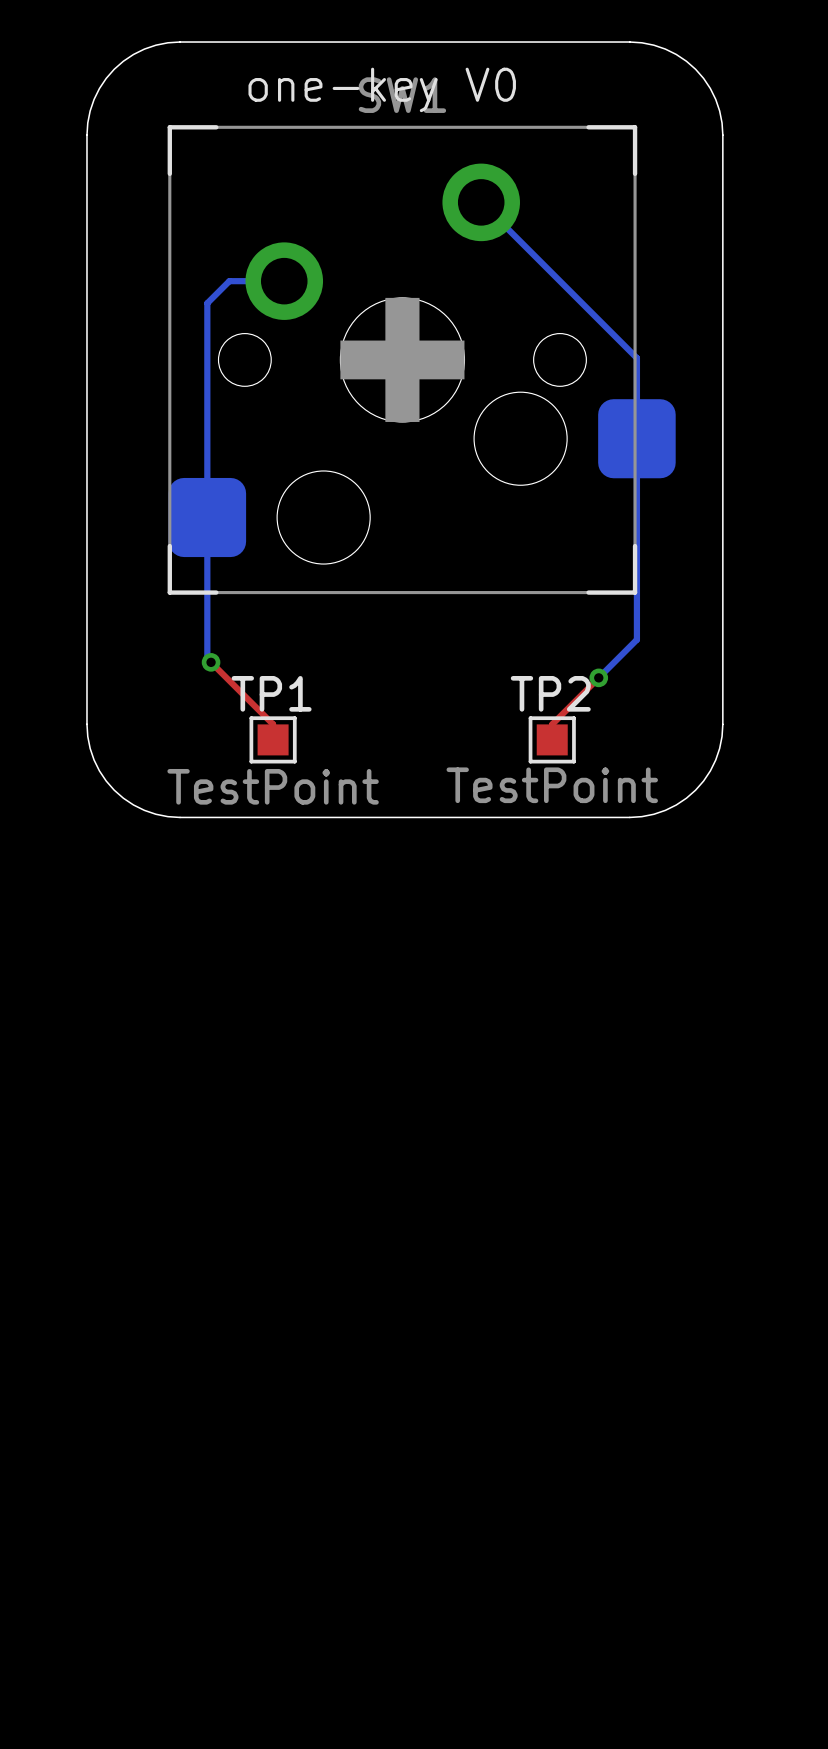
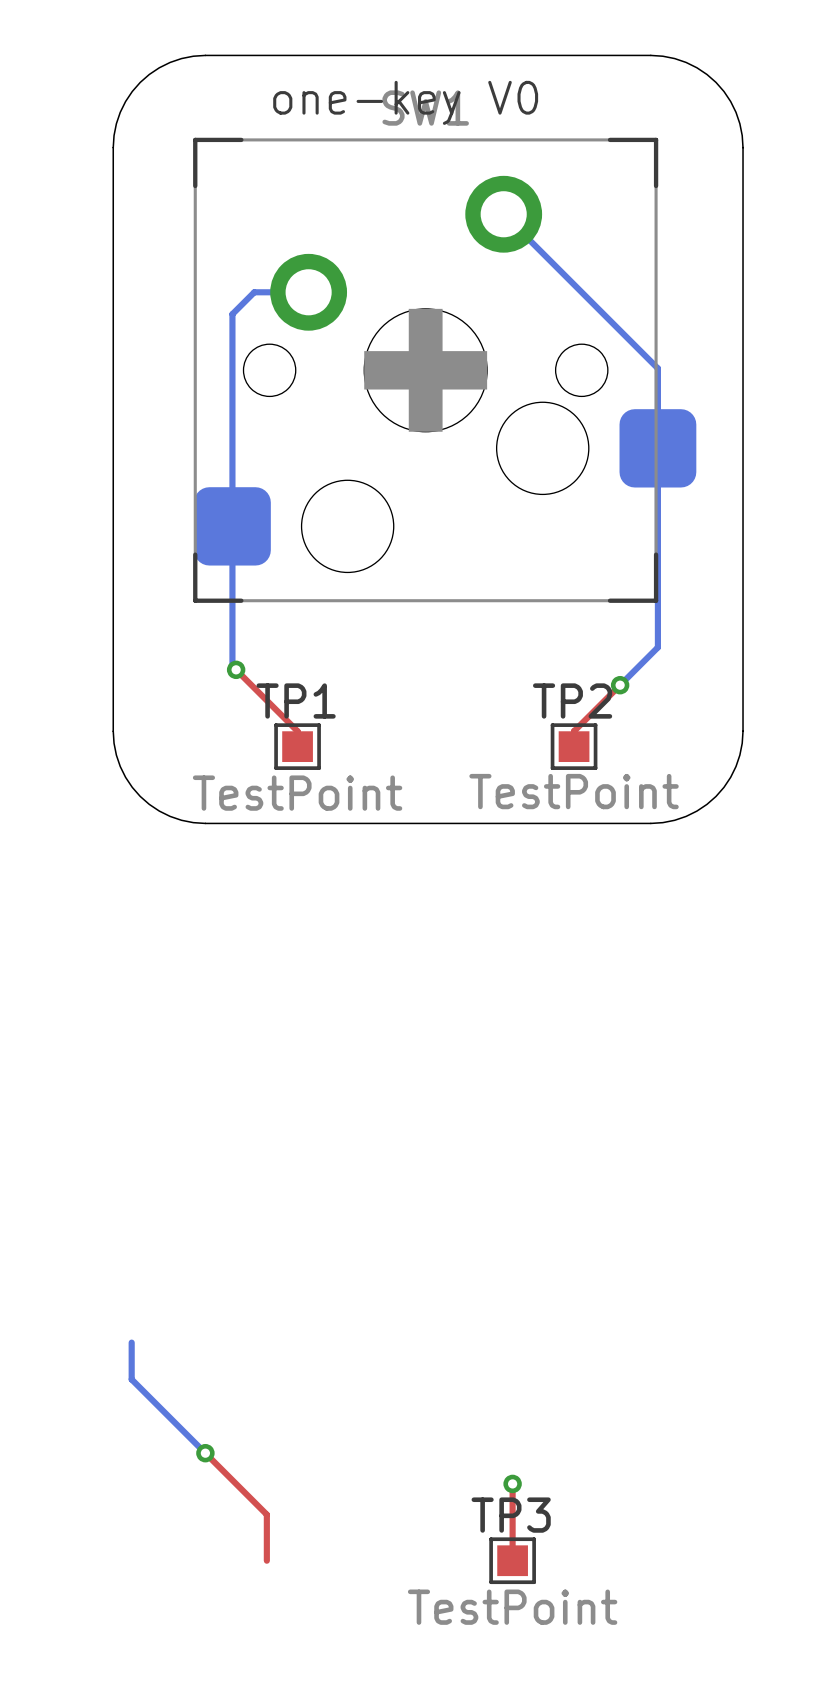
bottom track: none -> (131, 1342) (131, 1379) (205, 1453)
top track: none -> (205, 1453) (266, 1514) (266, 1560)
via: none -> (205, 1453)
top track: none -> (512, 1483) (512, 1560)
via: none -> (512, 1483)
TP3: none -> TestPoint (512, 1560)

